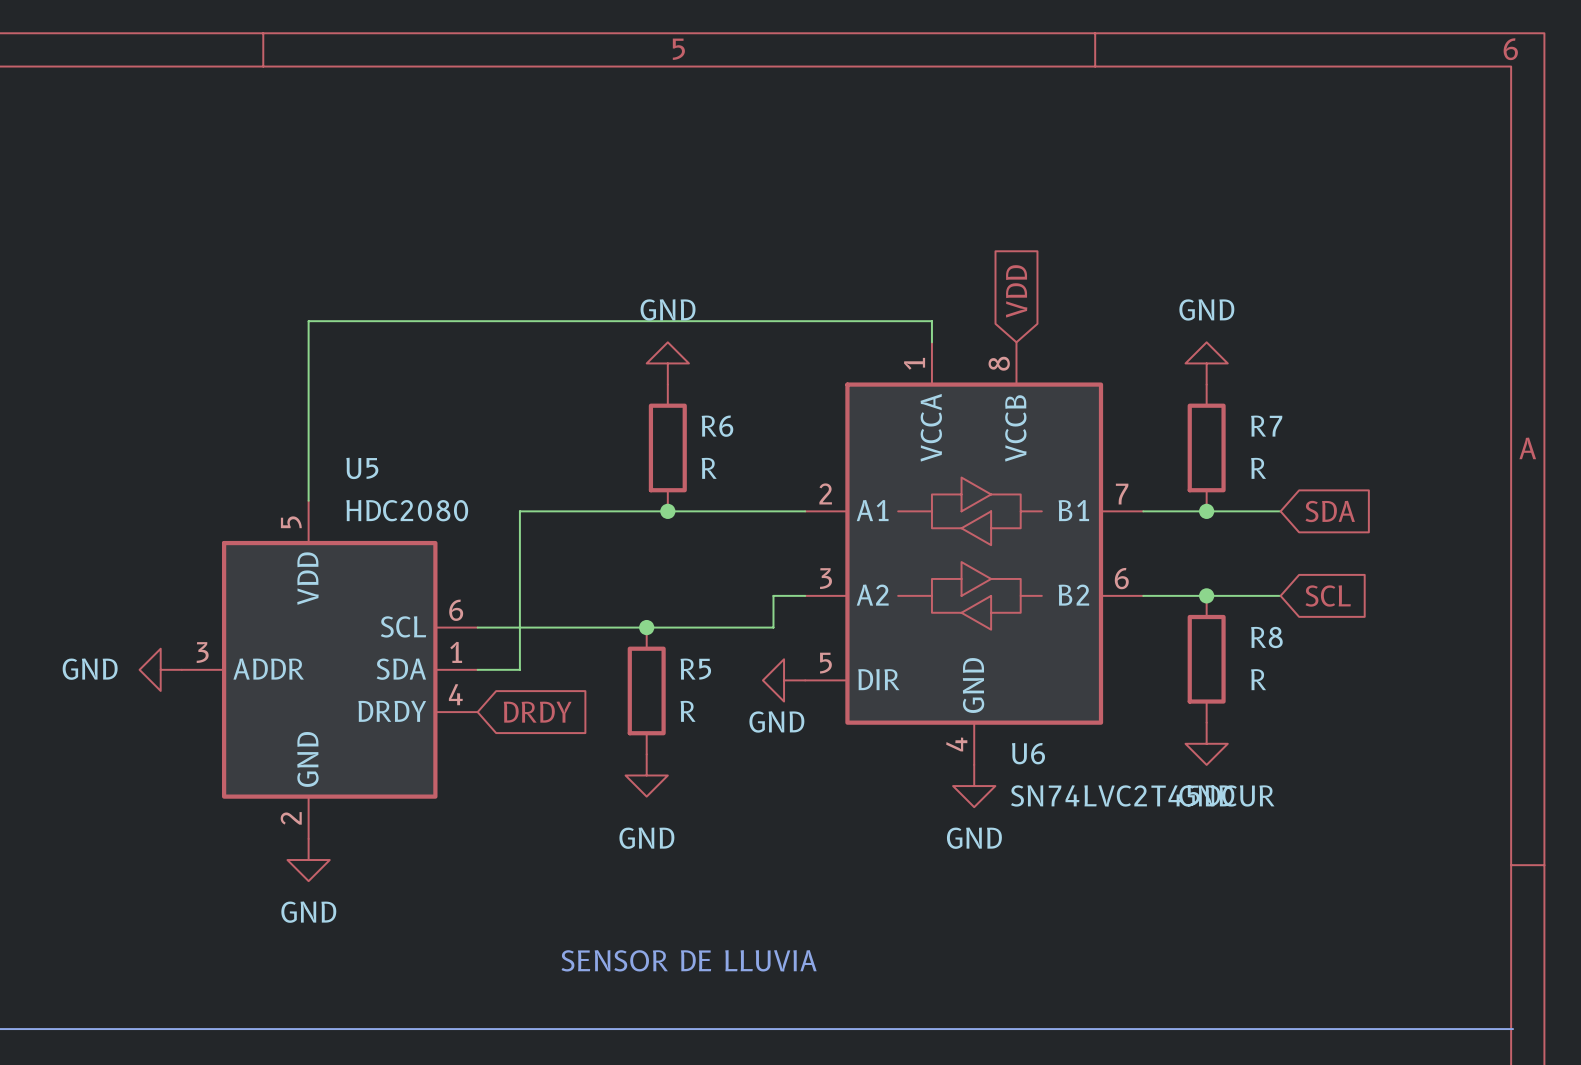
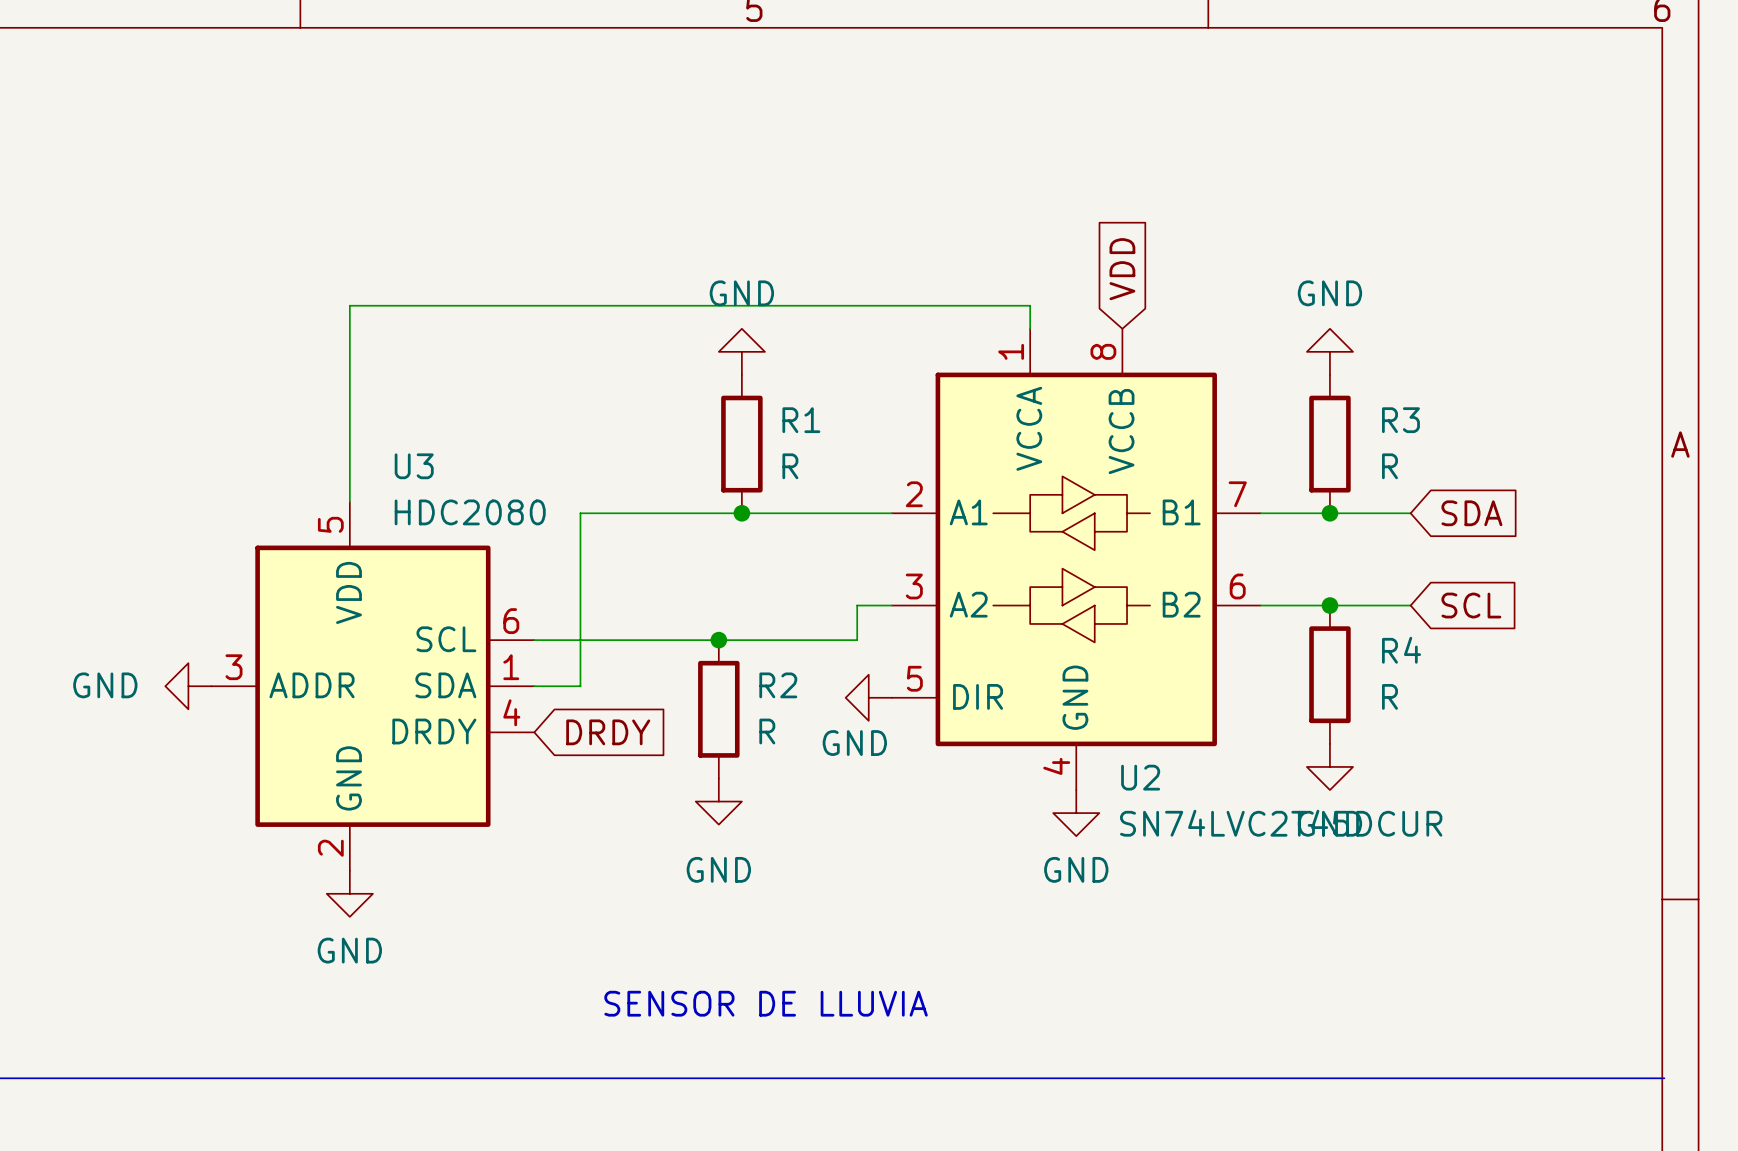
R6 name: R6 (717, 426) -> R1 (801, 420)
R7 name: R7 (1266, 426) -> R3 (1400, 420)
U5 name: U5 (362, 468) -> U3 (414, 466)
R8 name: R8 (1266, 637) -> R4 (1401, 650)
R5 name: R5 (695, 669) -> R2 (778, 685)
U6 name: U6 (1028, 753) -> U2 (1140, 777)

